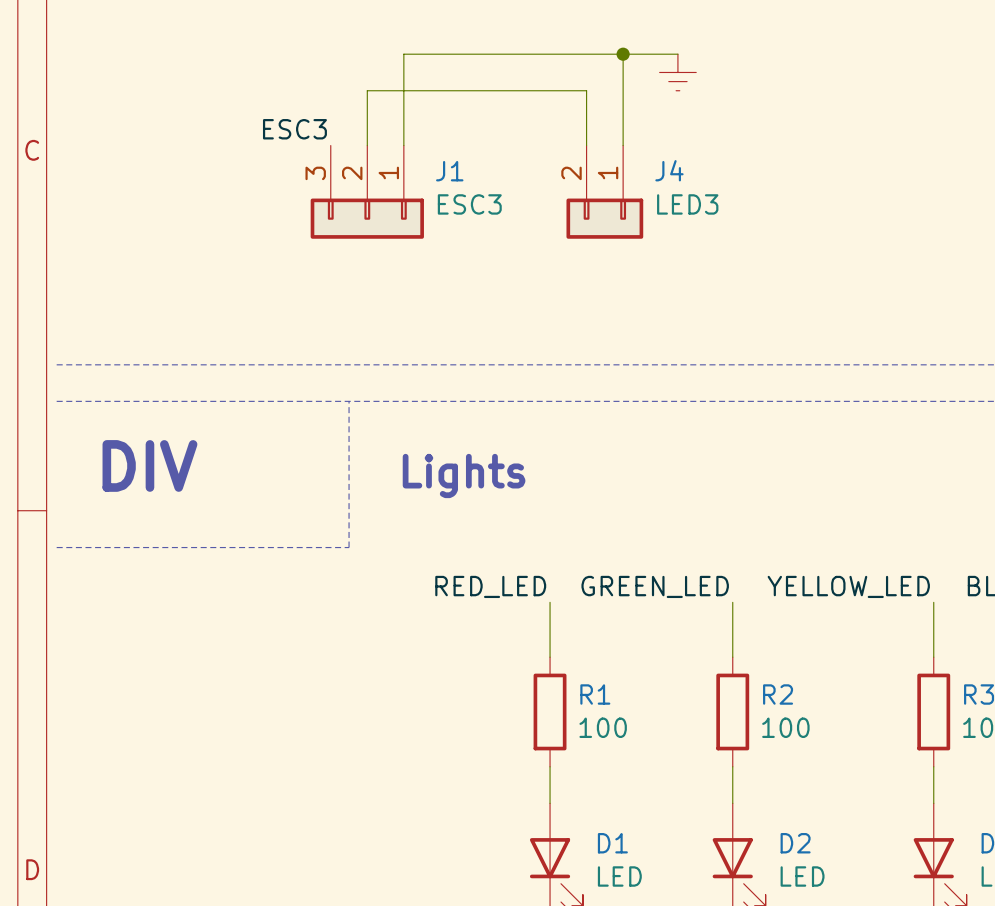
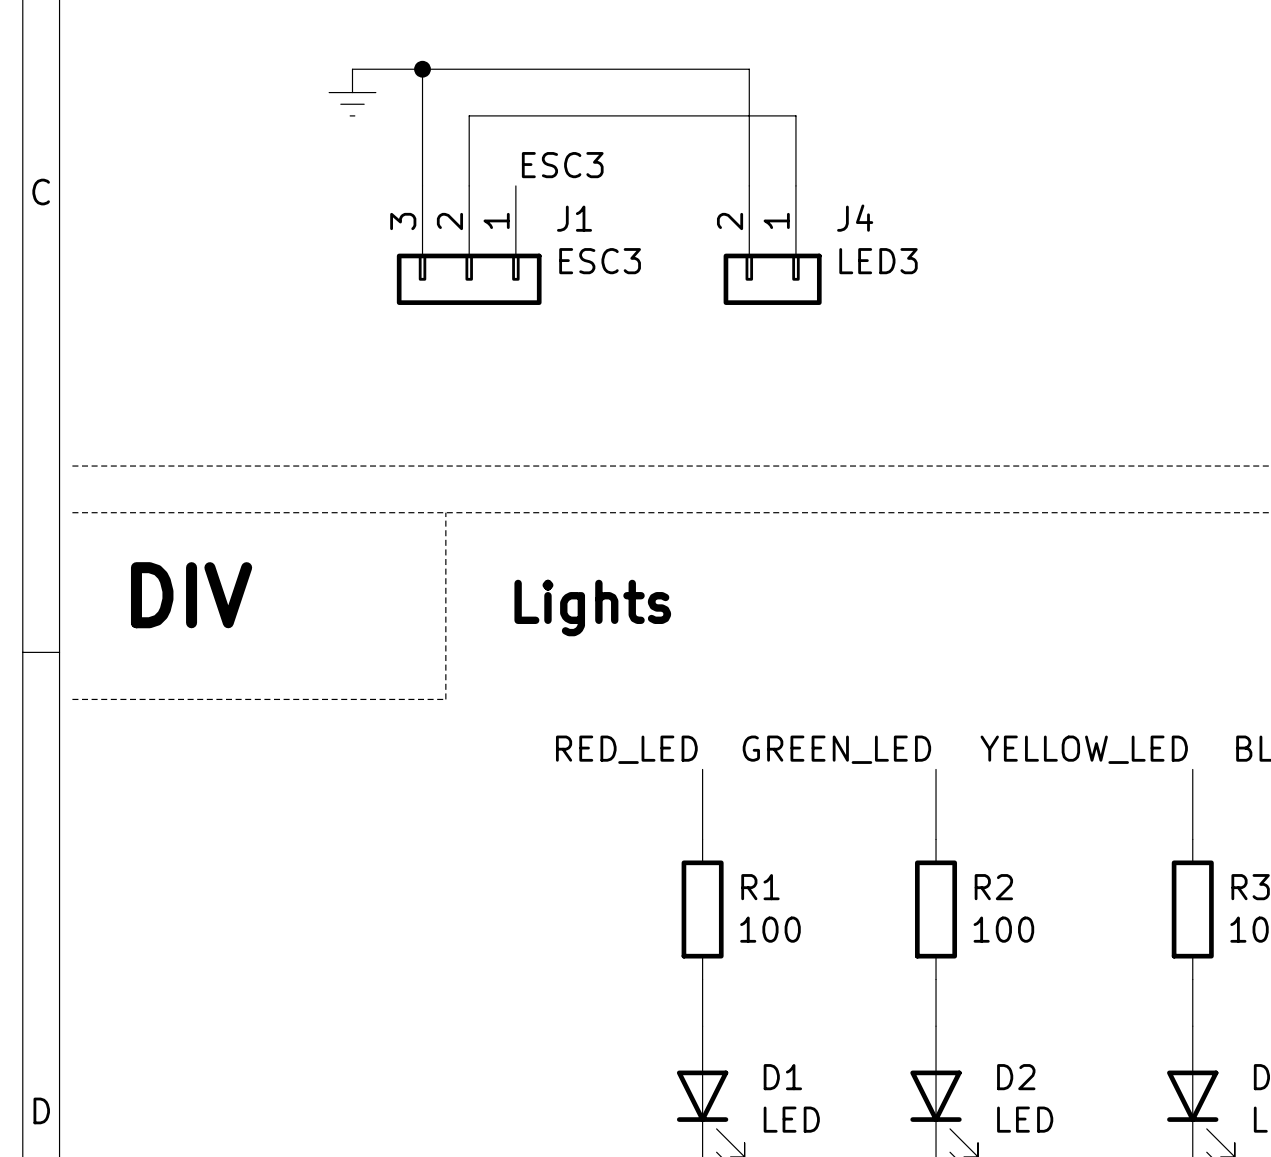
wire: none -> (422, 69) (422, 185)
junction: none -> (422, 69)
wire: (403, 54) (403, 145) -> (515, 69) (352, 69)
wire: (586, 54) (677, 54) -> none
wire: (623, 54) (623, 90) -> (749, 69) (749, 115) (795, 115)
junction: (623, 54) -> none
power symbol: none -> (352, 92)
power symbol: (677, 72) -> none
label position: ESC3 (294, 129) -> ESC3 (562, 165)

